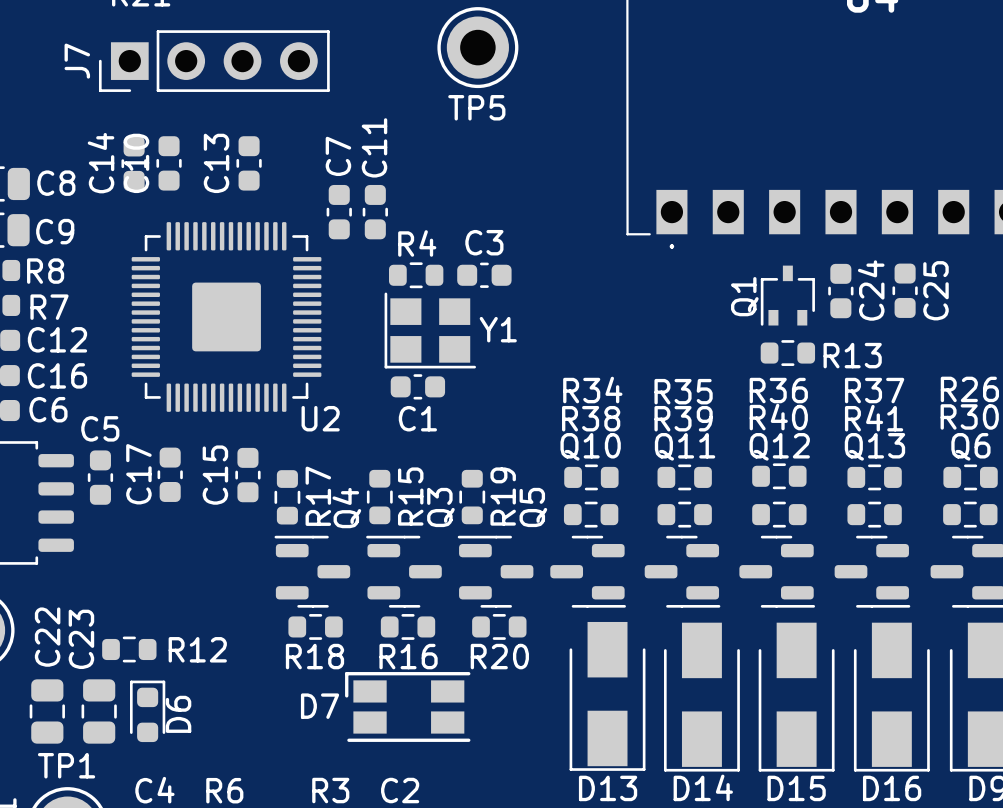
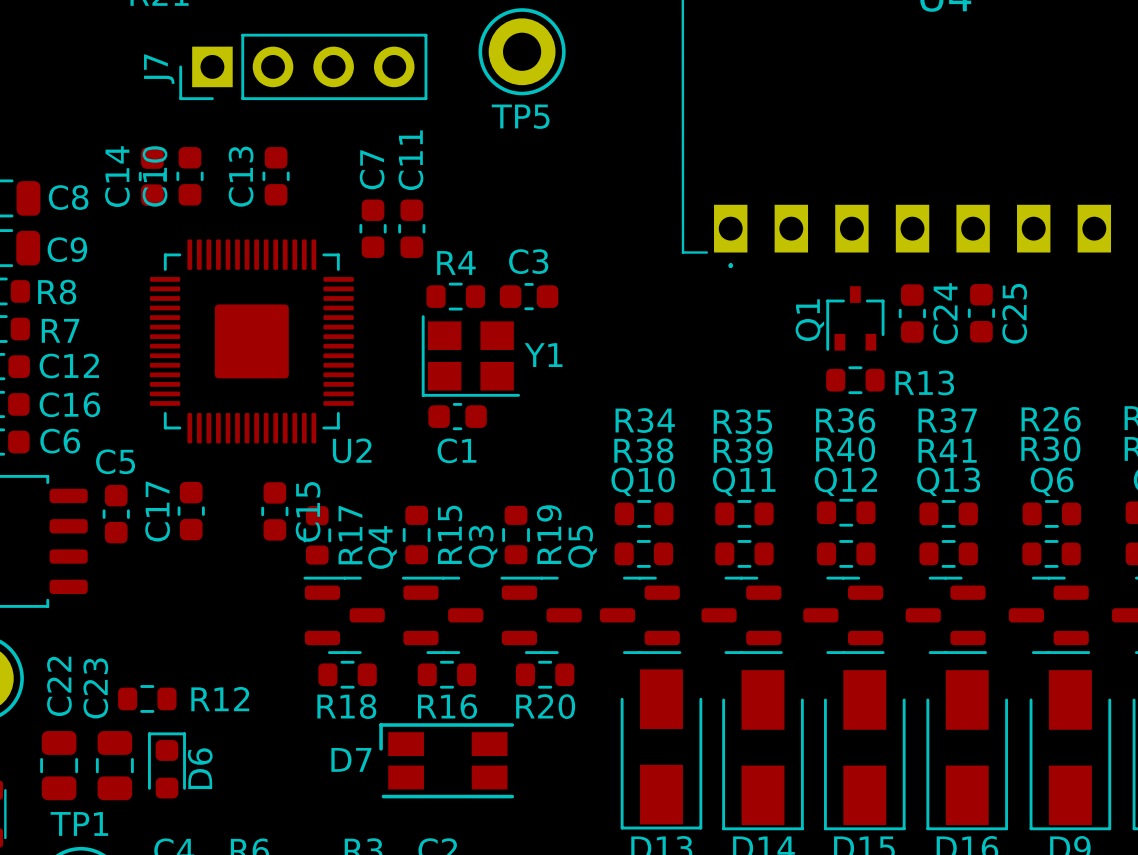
J7 position: (214, 61) -> (303, 66)
C15 name position: C15 (215, 475) -> C15 (308, 511)

